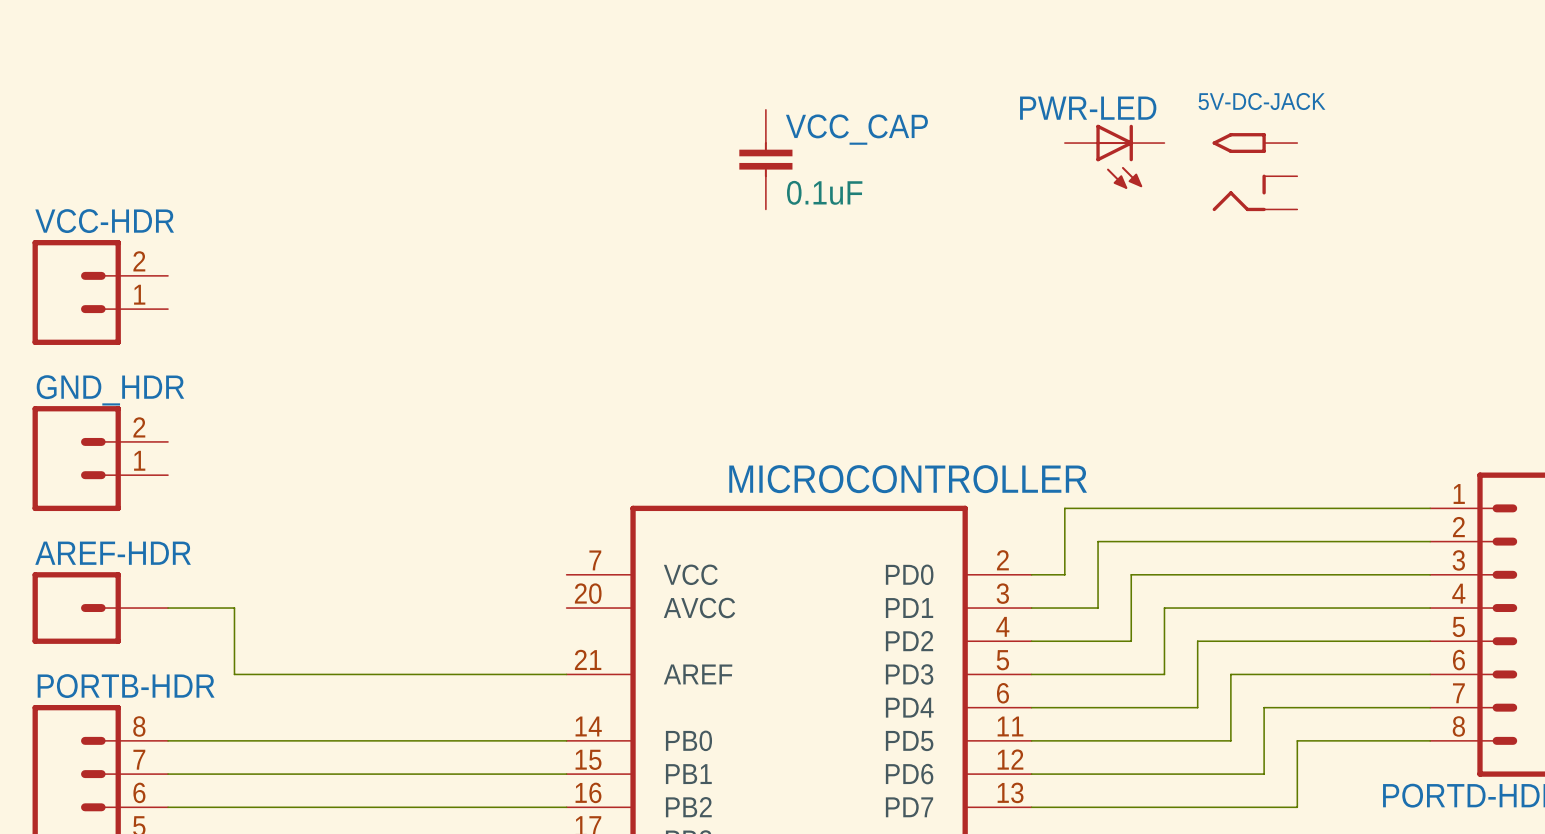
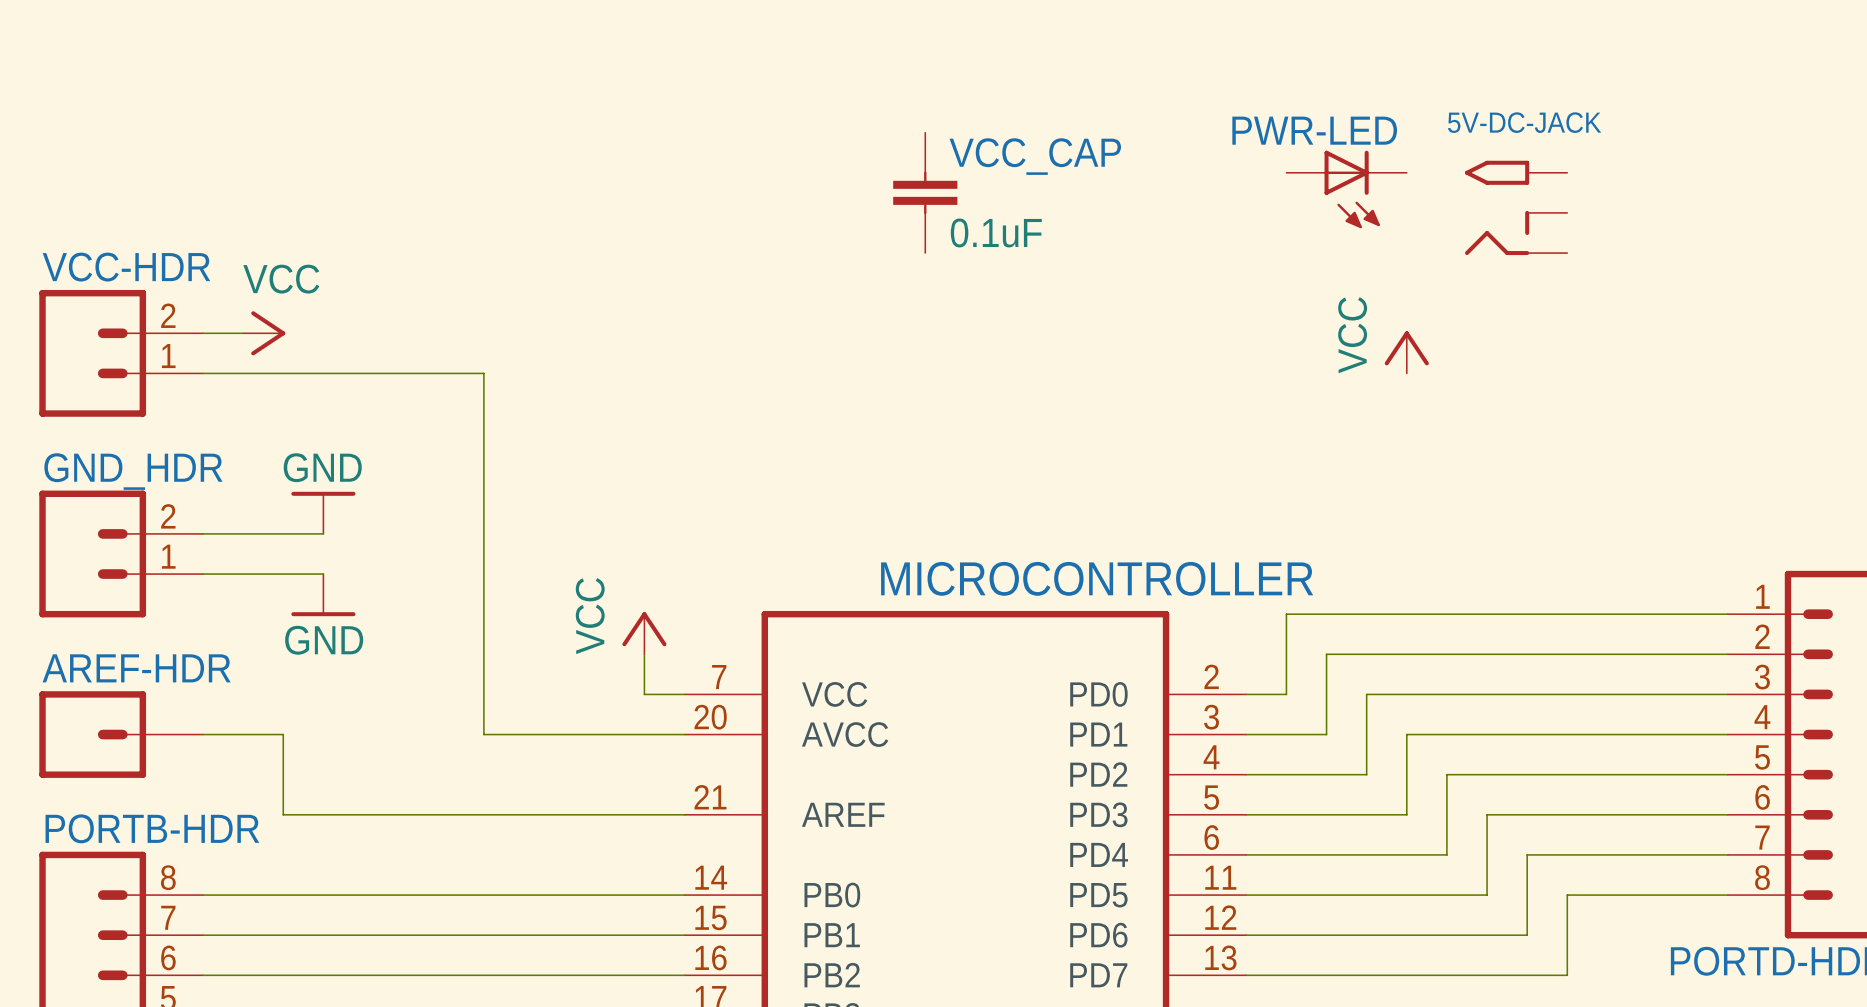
wire: none -> (203, 333) (243, 333)
power symbol: none -> VCC (264, 333)
power symbol: none -> VCC (1406, 352)
wire: none -> (203, 373) (483, 373) (483, 734) (684, 734)
power symbol: none -> GND (323, 512)
wire: none -> (203, 533) (323, 533)
wire: none -> (203, 574) (323, 574)
power symbol: none -> GND (323, 595)
power symbol: none -> VCC (644, 633)
wire: none -> (644, 654) (644, 694) (684, 694)

